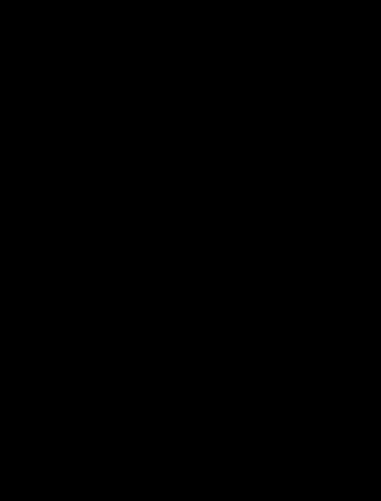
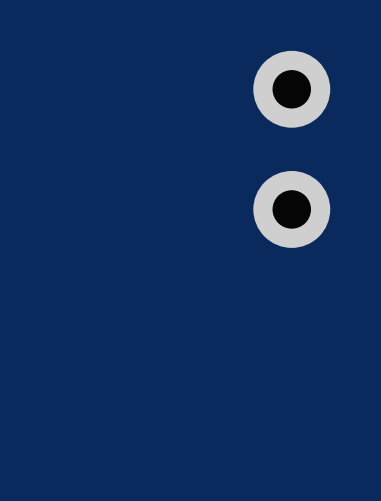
part: none -> (291, 149)

